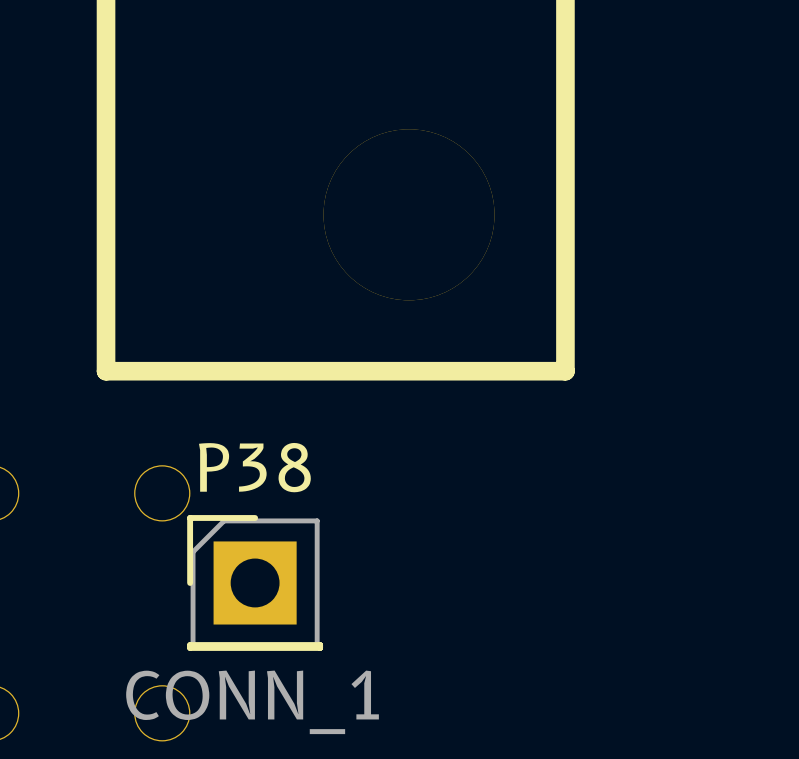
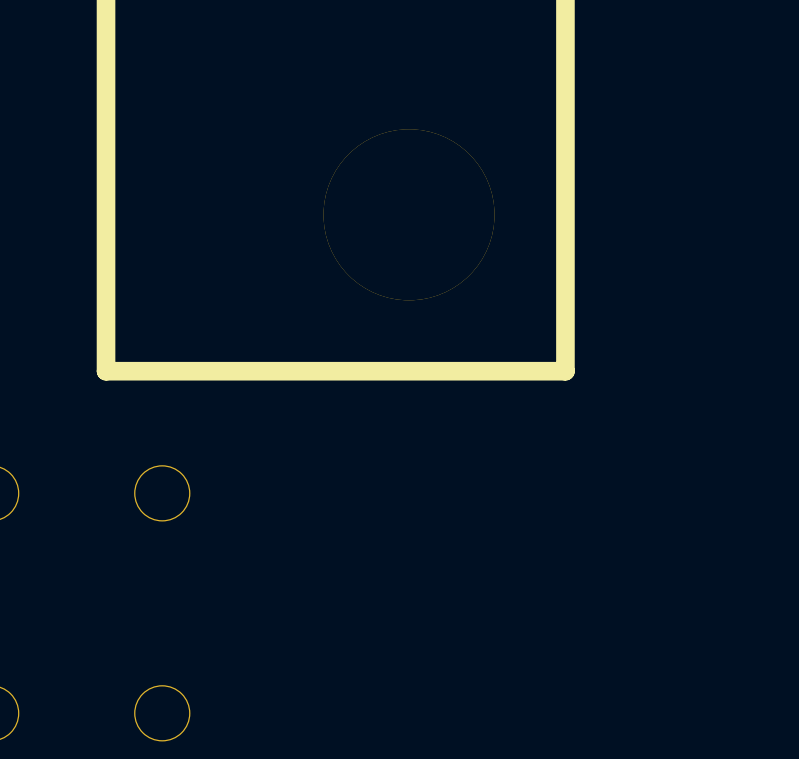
P38: CONN_1 (255, 582) -> none

